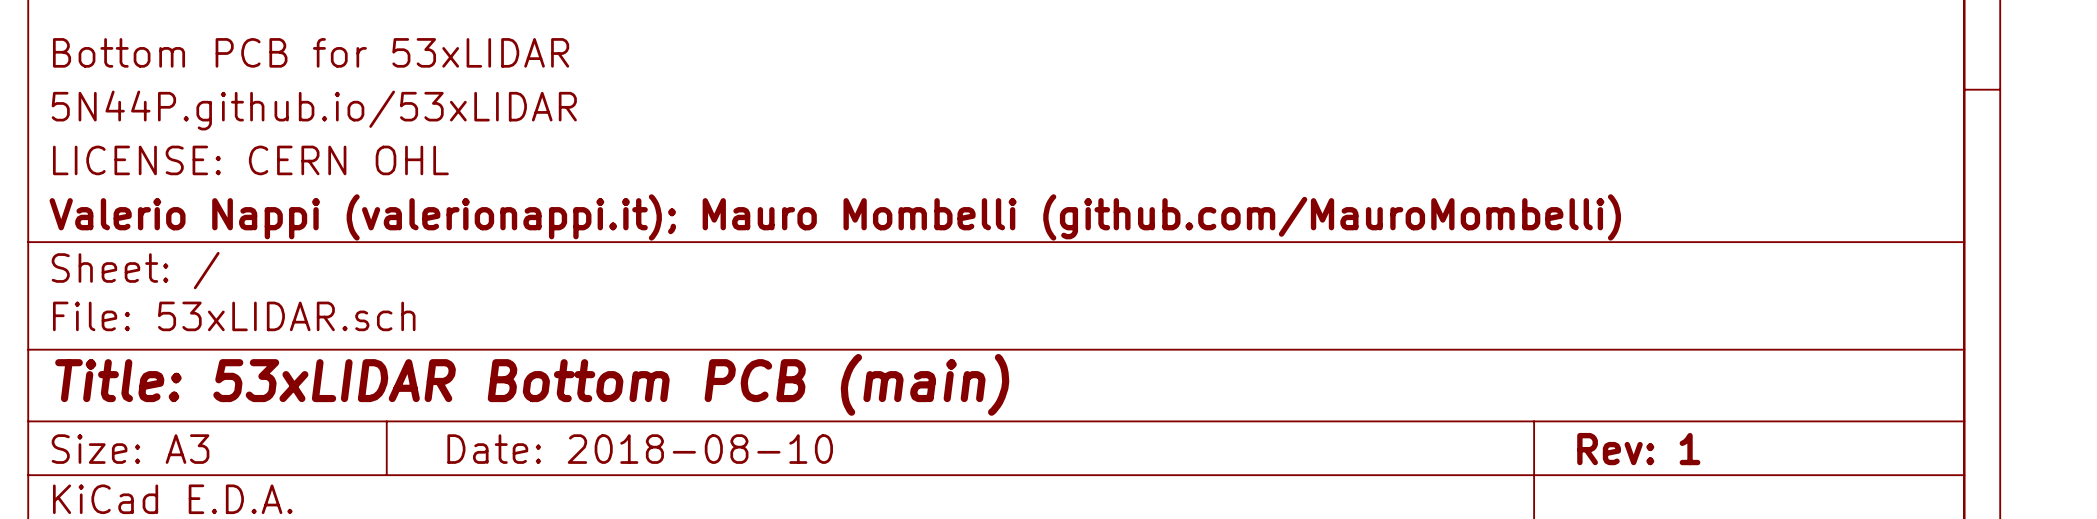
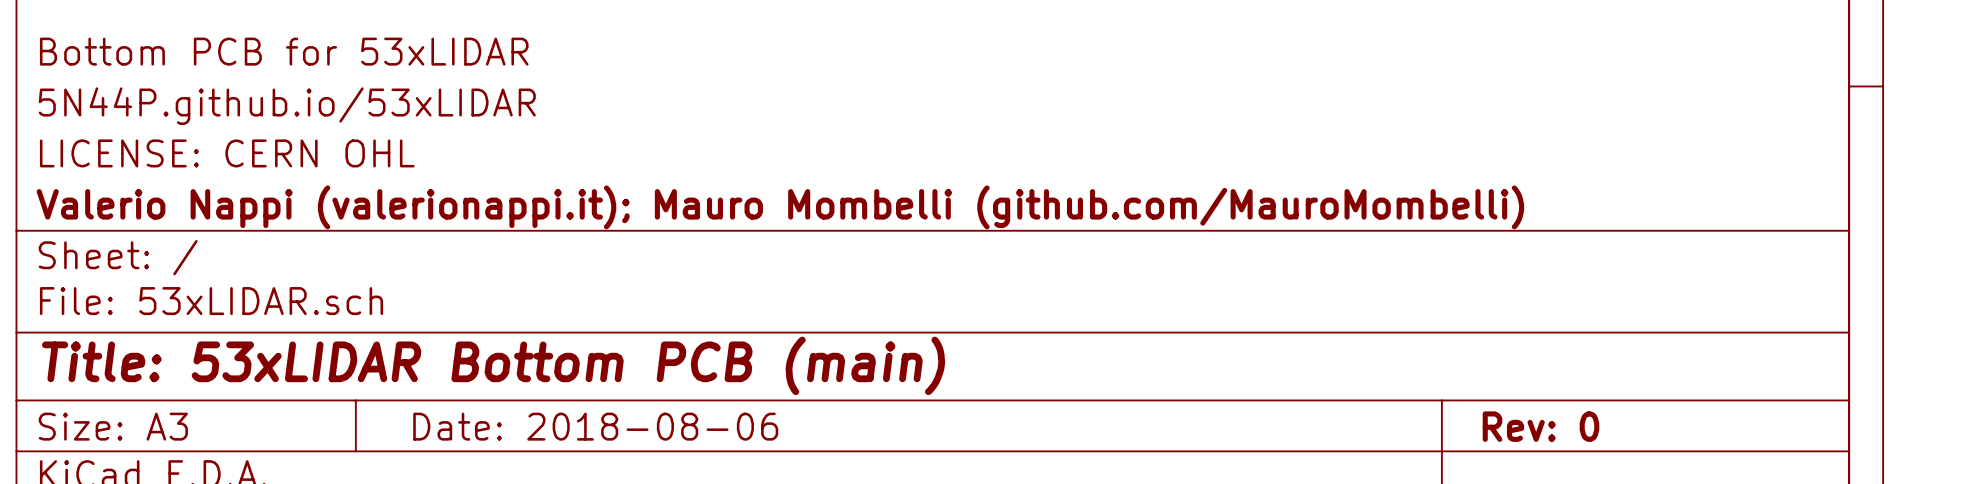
title block: Date: 2018-08-10 (640, 449) -> Date: 2018-08-06 (595, 426)
title block: Rev: 1 (1638, 449) -> Rev: 0 (1540, 426)

